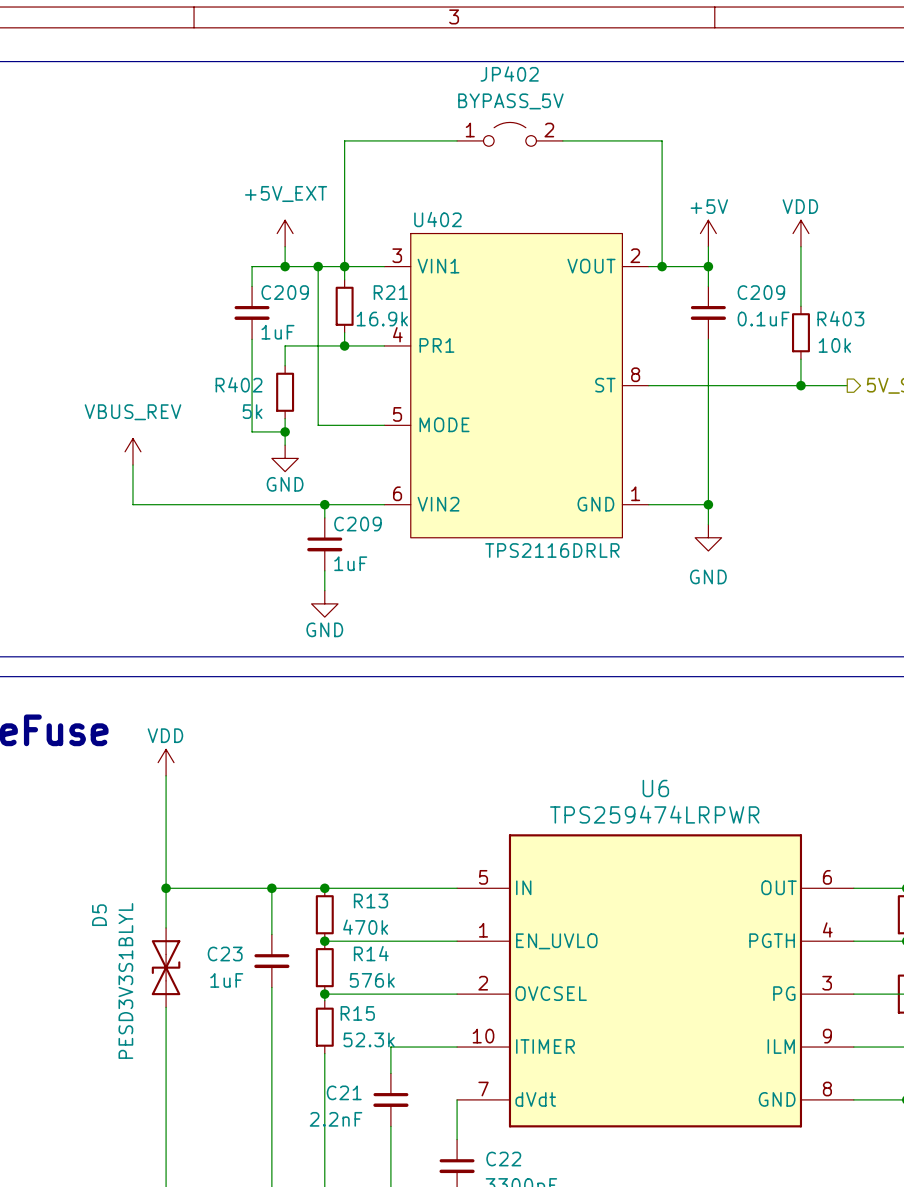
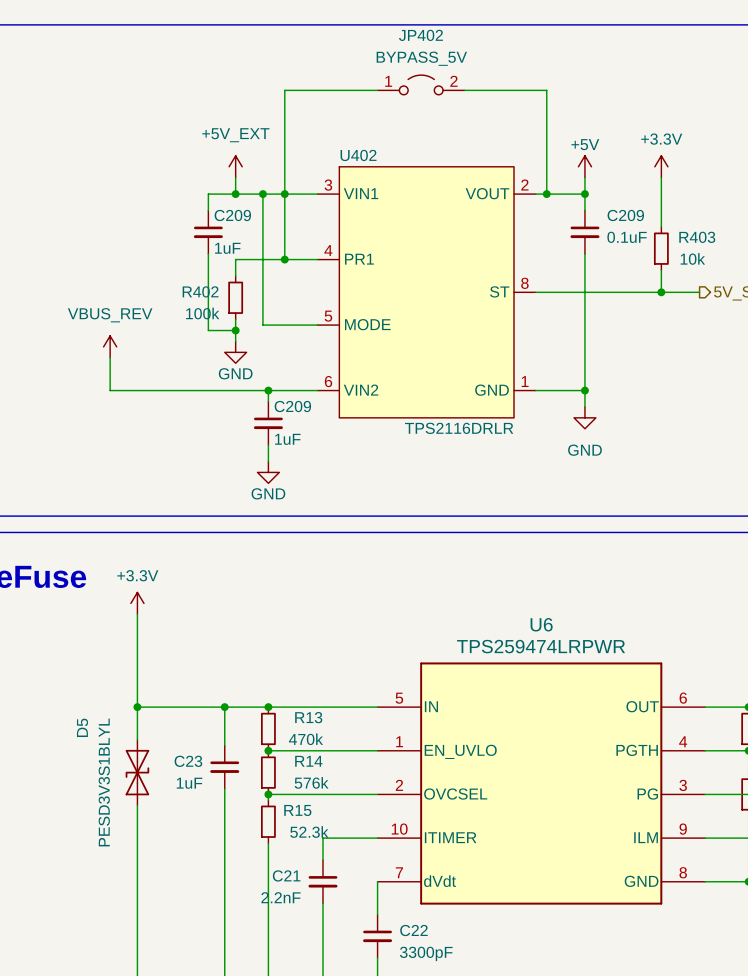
power symbol: VDD (800, 233) -> +3.3V (661, 166)
wire: none -> (284, 204) (284, 248)
R21: 16.9k (344, 306) -> none
R402 value: 5k (252, 411) -> 100k (202, 313)
power symbol: VDD (166, 762) -> +3.3V (137, 603)

